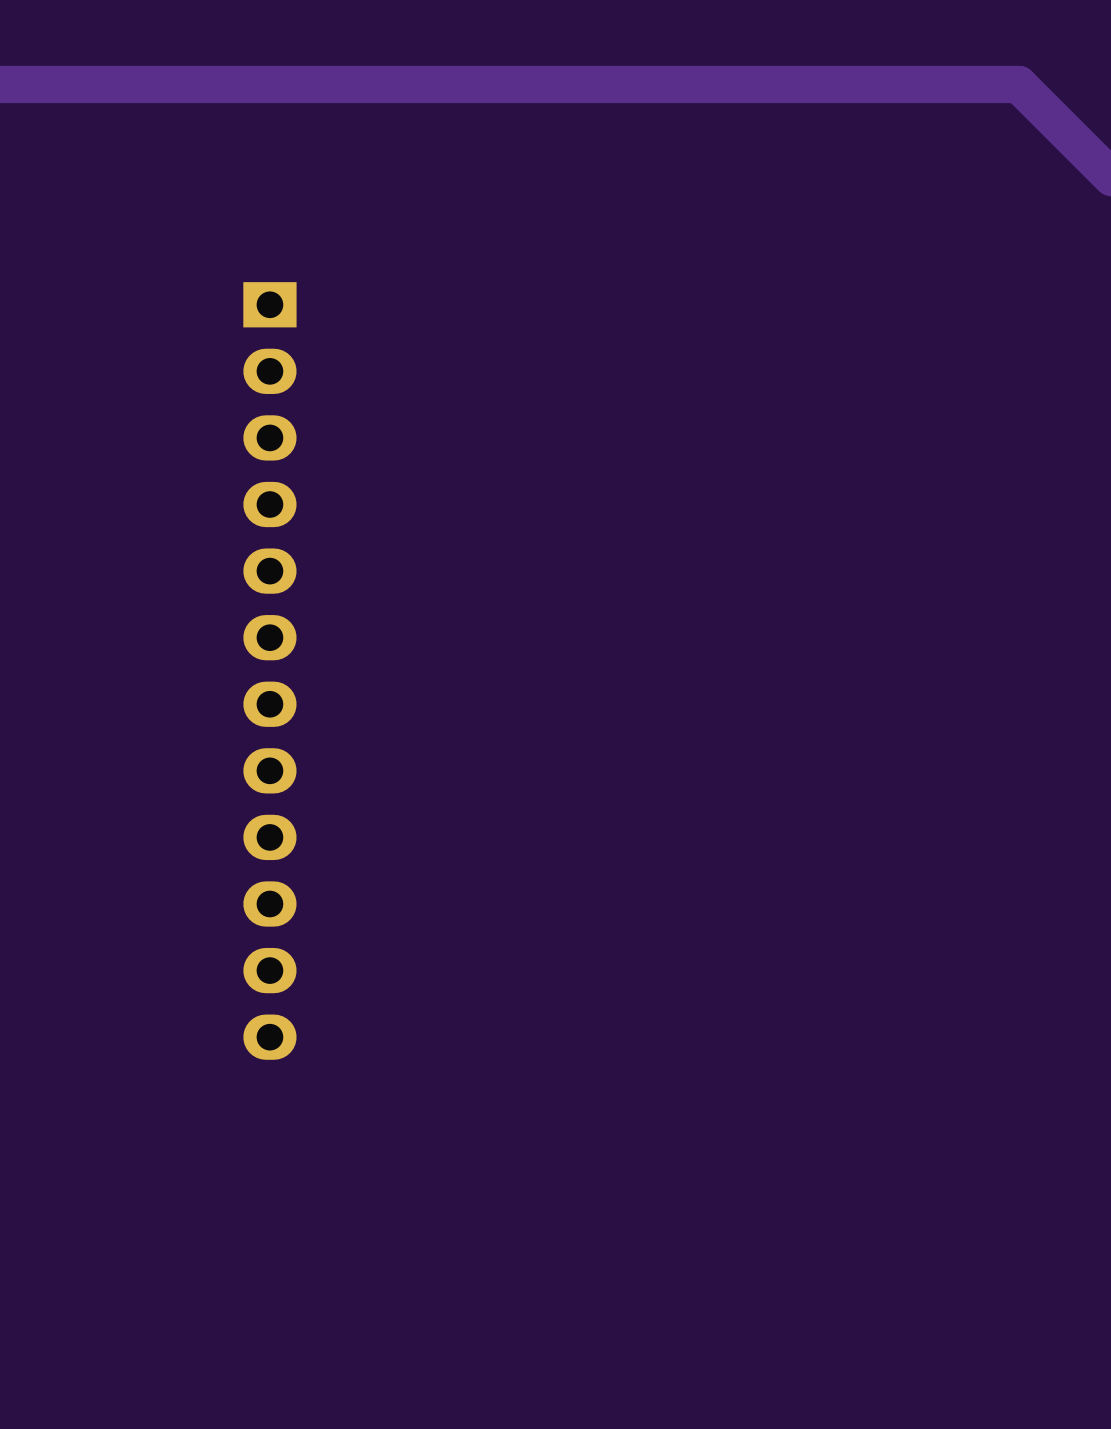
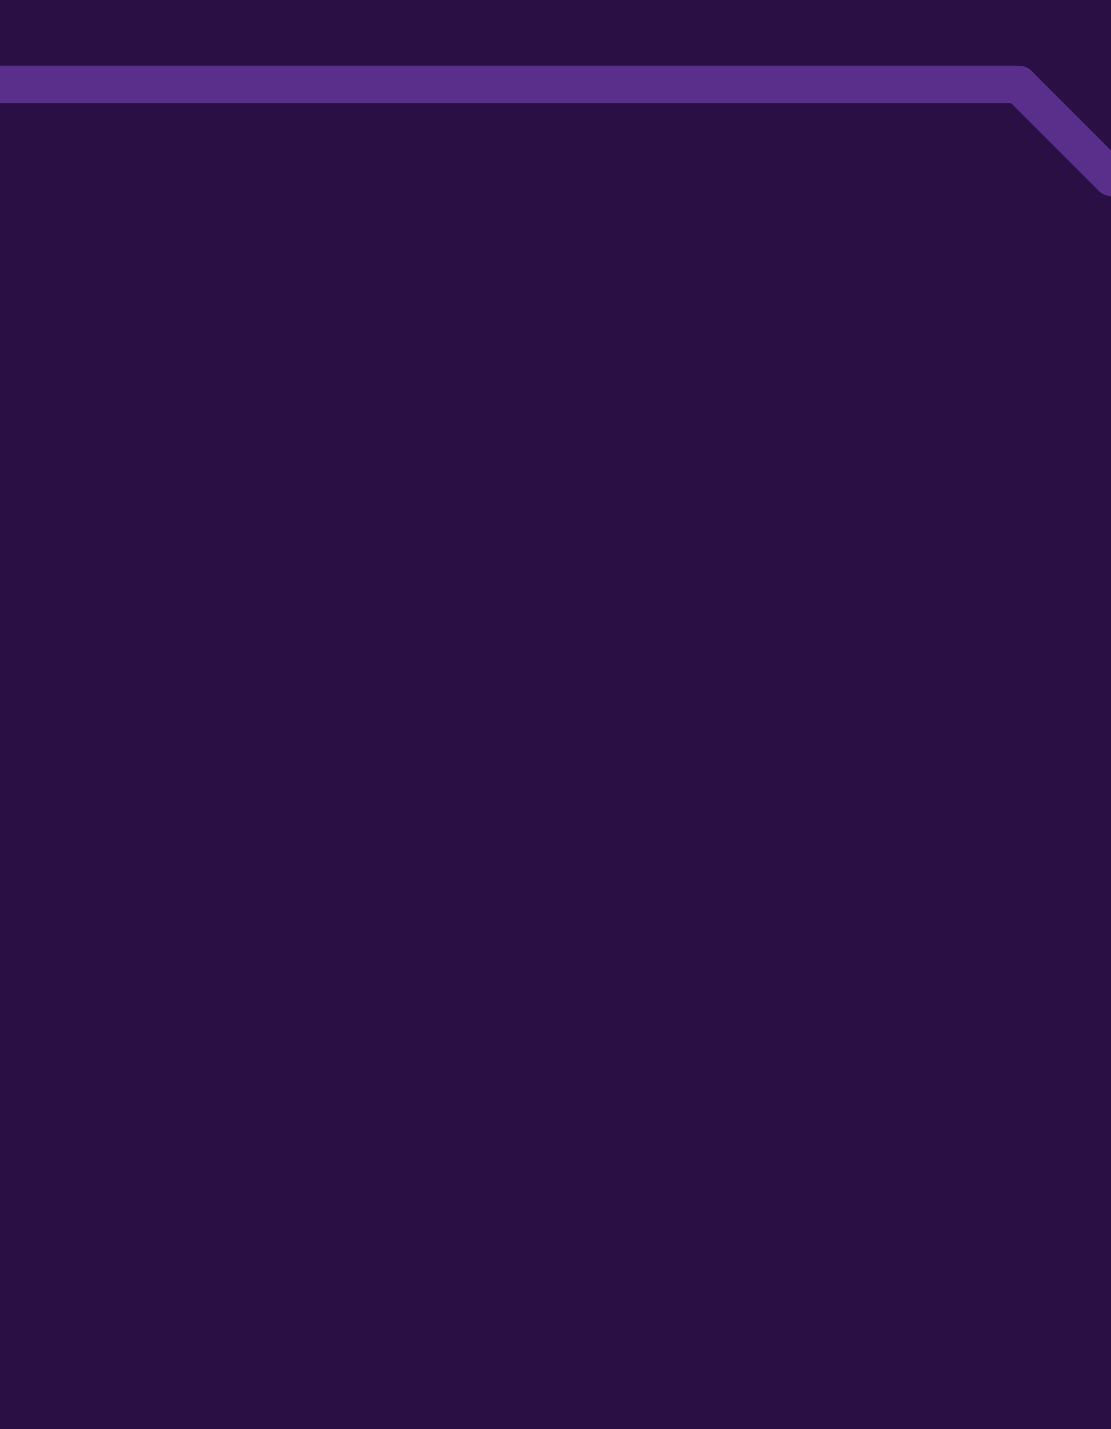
part: (269, 670) -> none

